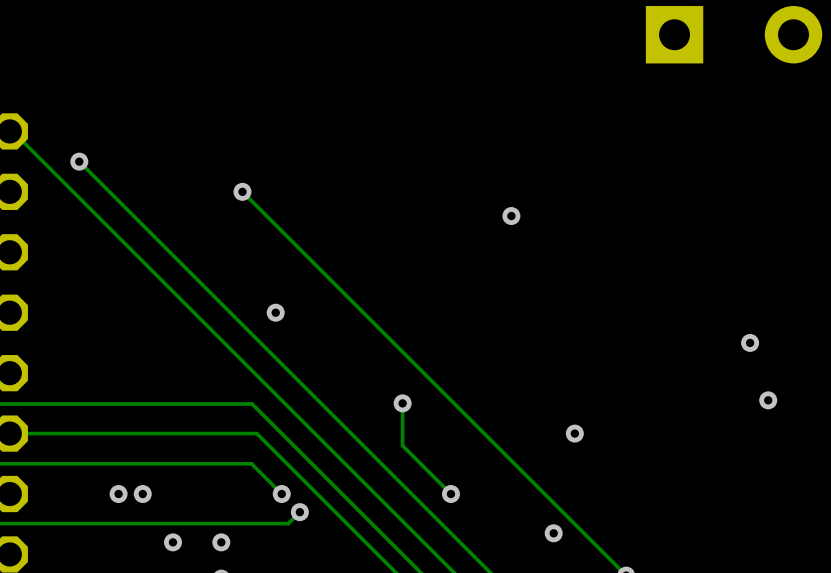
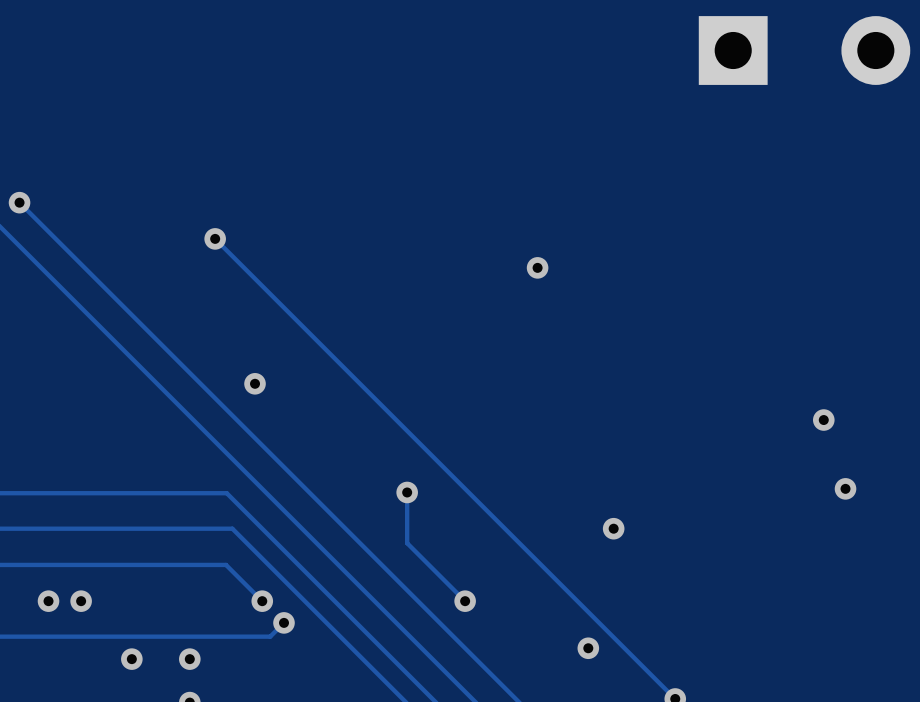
via: none -> (48, 601)
via: (118, 494) -> none
via: none -> (81, 601)
via: (142, 494) -> none

